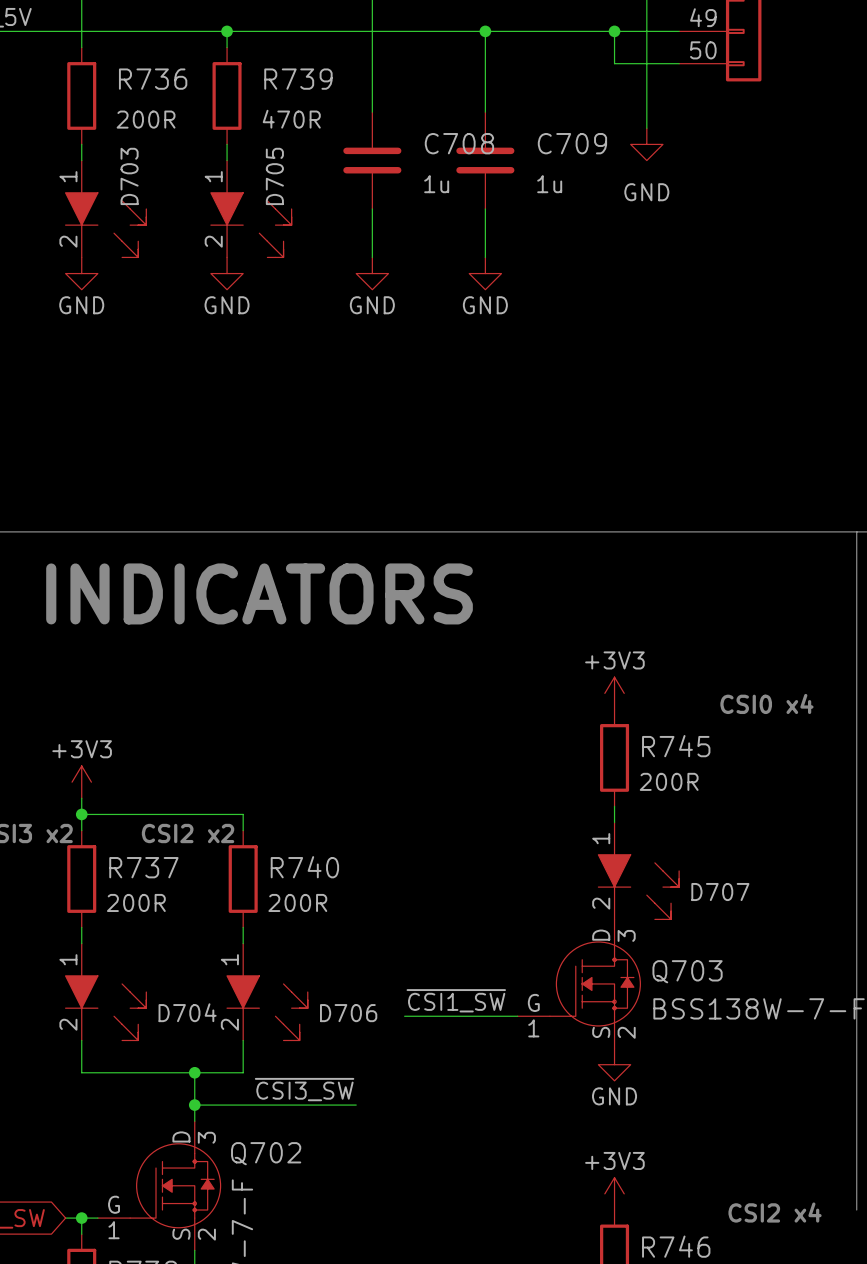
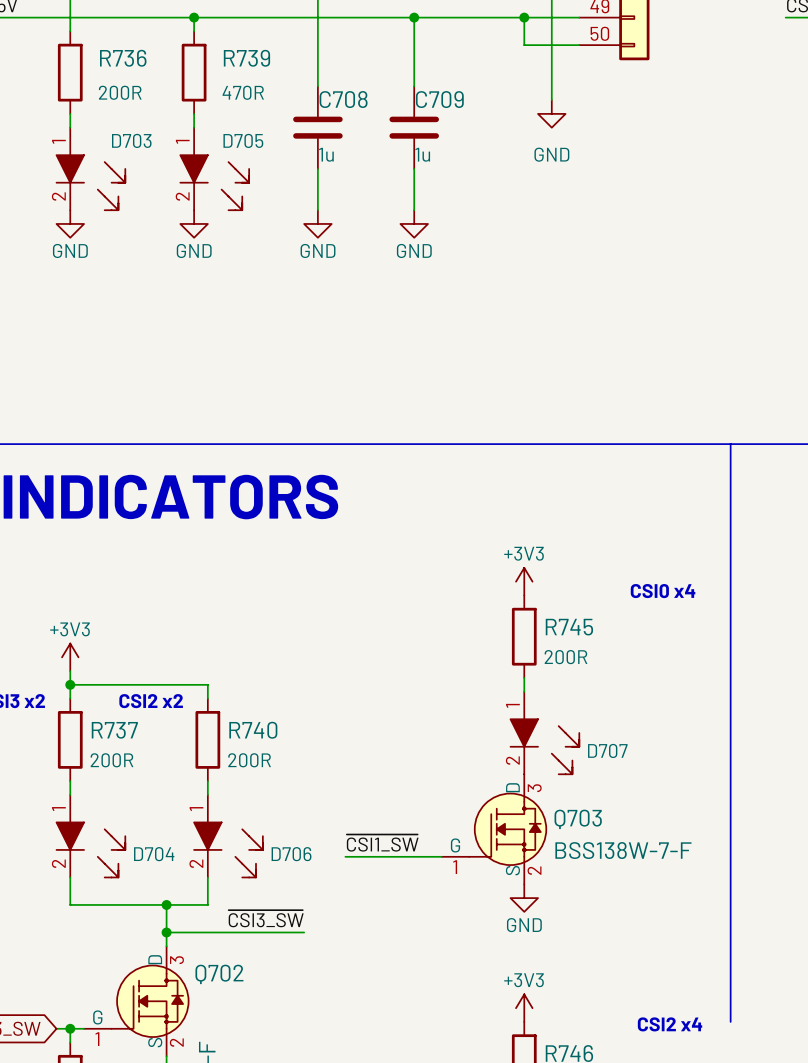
C708 name position: C708 (459, 143) -> C708 (343, 99)
C709 name position: C709 (572, 143) -> C709 (439, 99)
D703 name rotation: 0° (129, 176) -> 90° clockwise (131, 140)
D705 name rotation: 0° (274, 176) -> 90° clockwise (243, 140)
C708 text position: 1u (436, 184) -> 1u (326, 154)
C709 text position: 1u (549, 184) -> 1u (422, 154)

